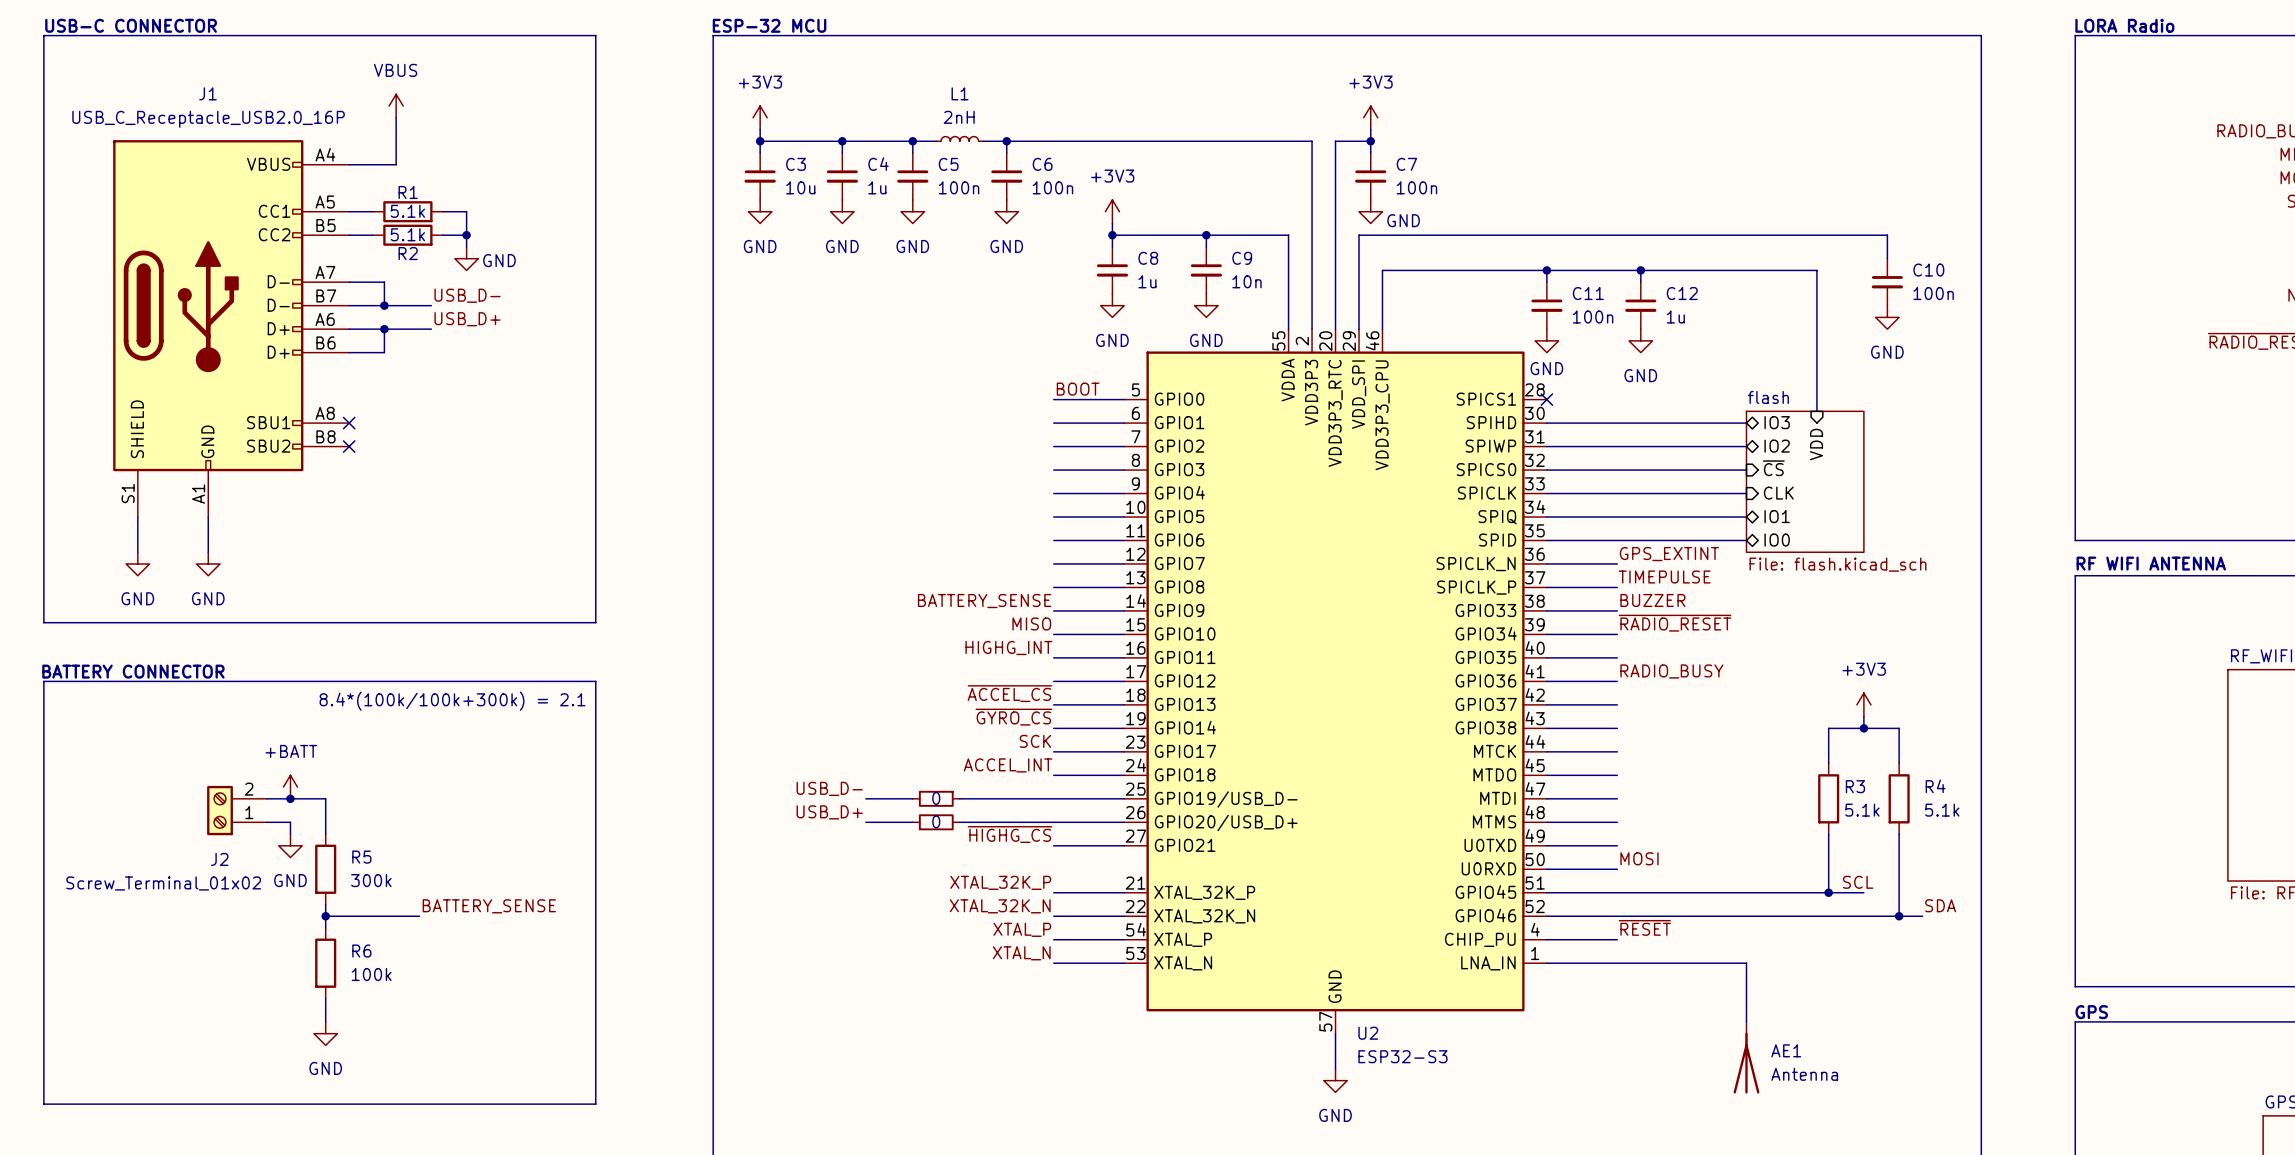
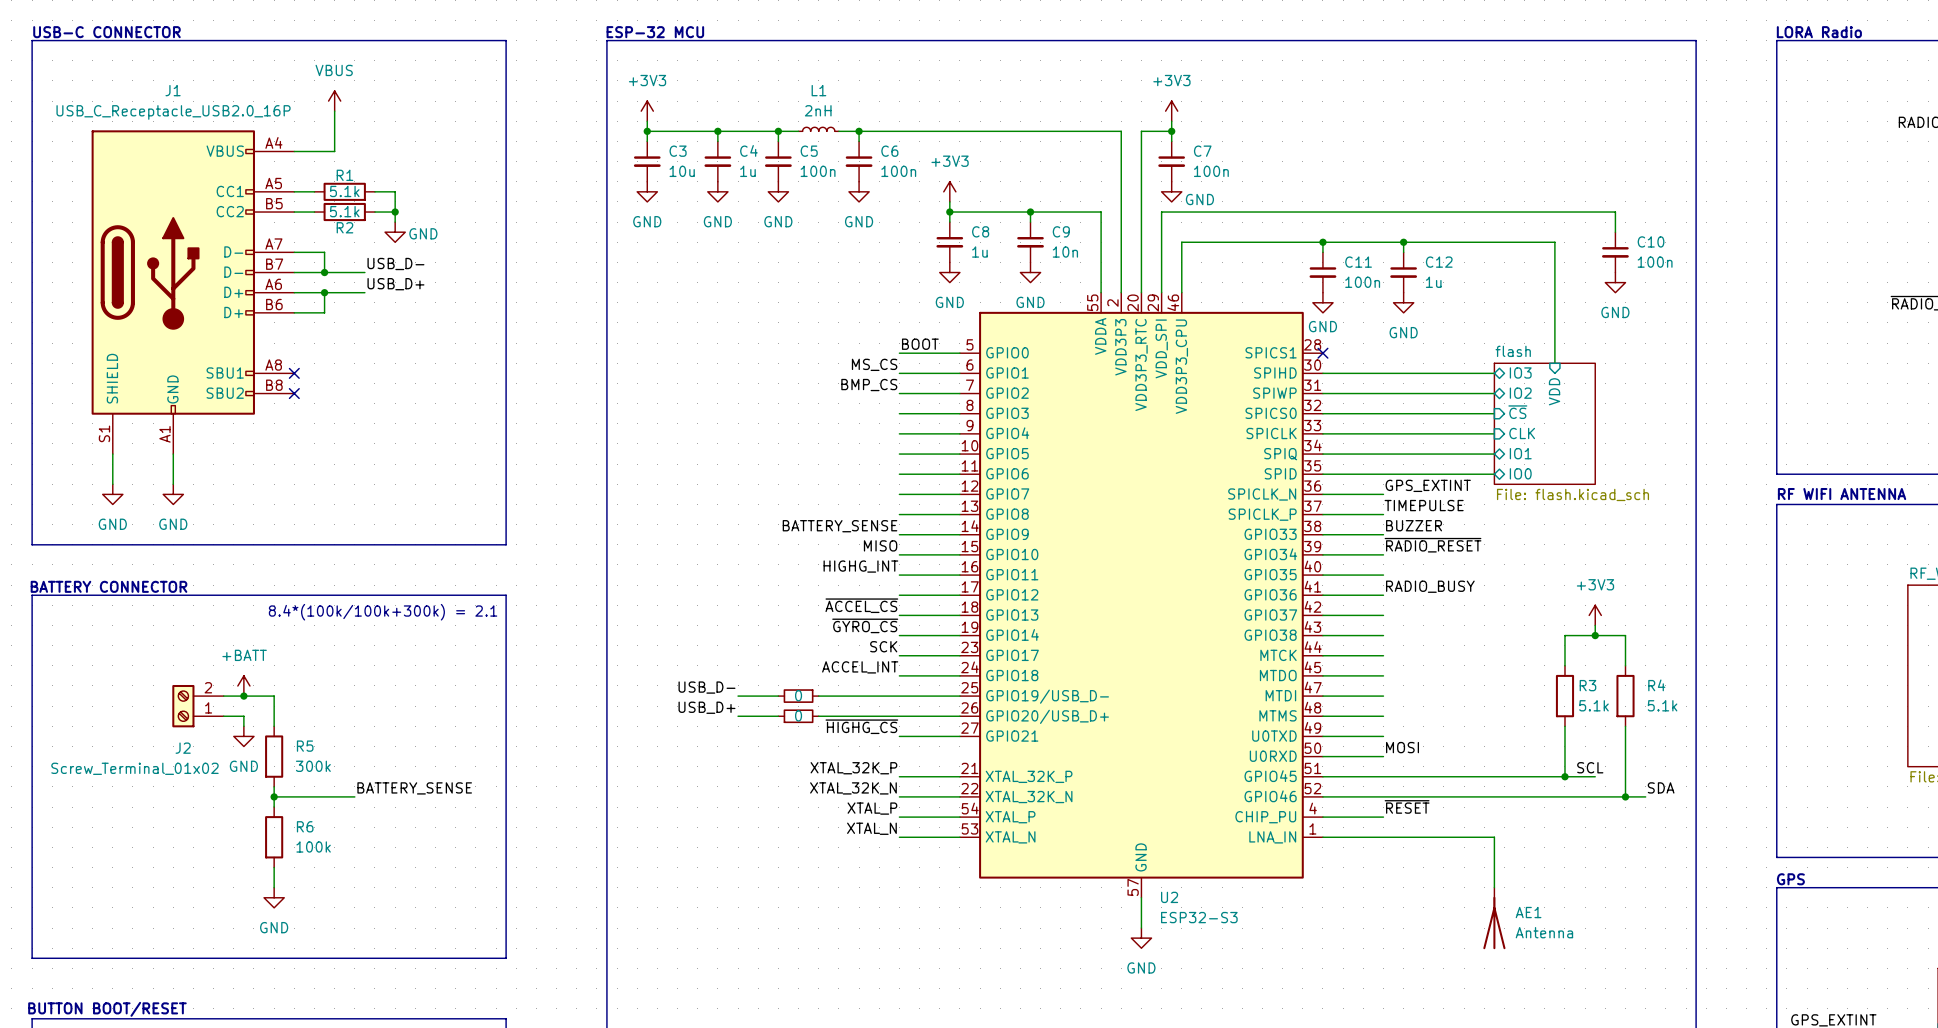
label: none -> MS_CS (874, 364)
label: none -> BMP_CS (869, 385)

